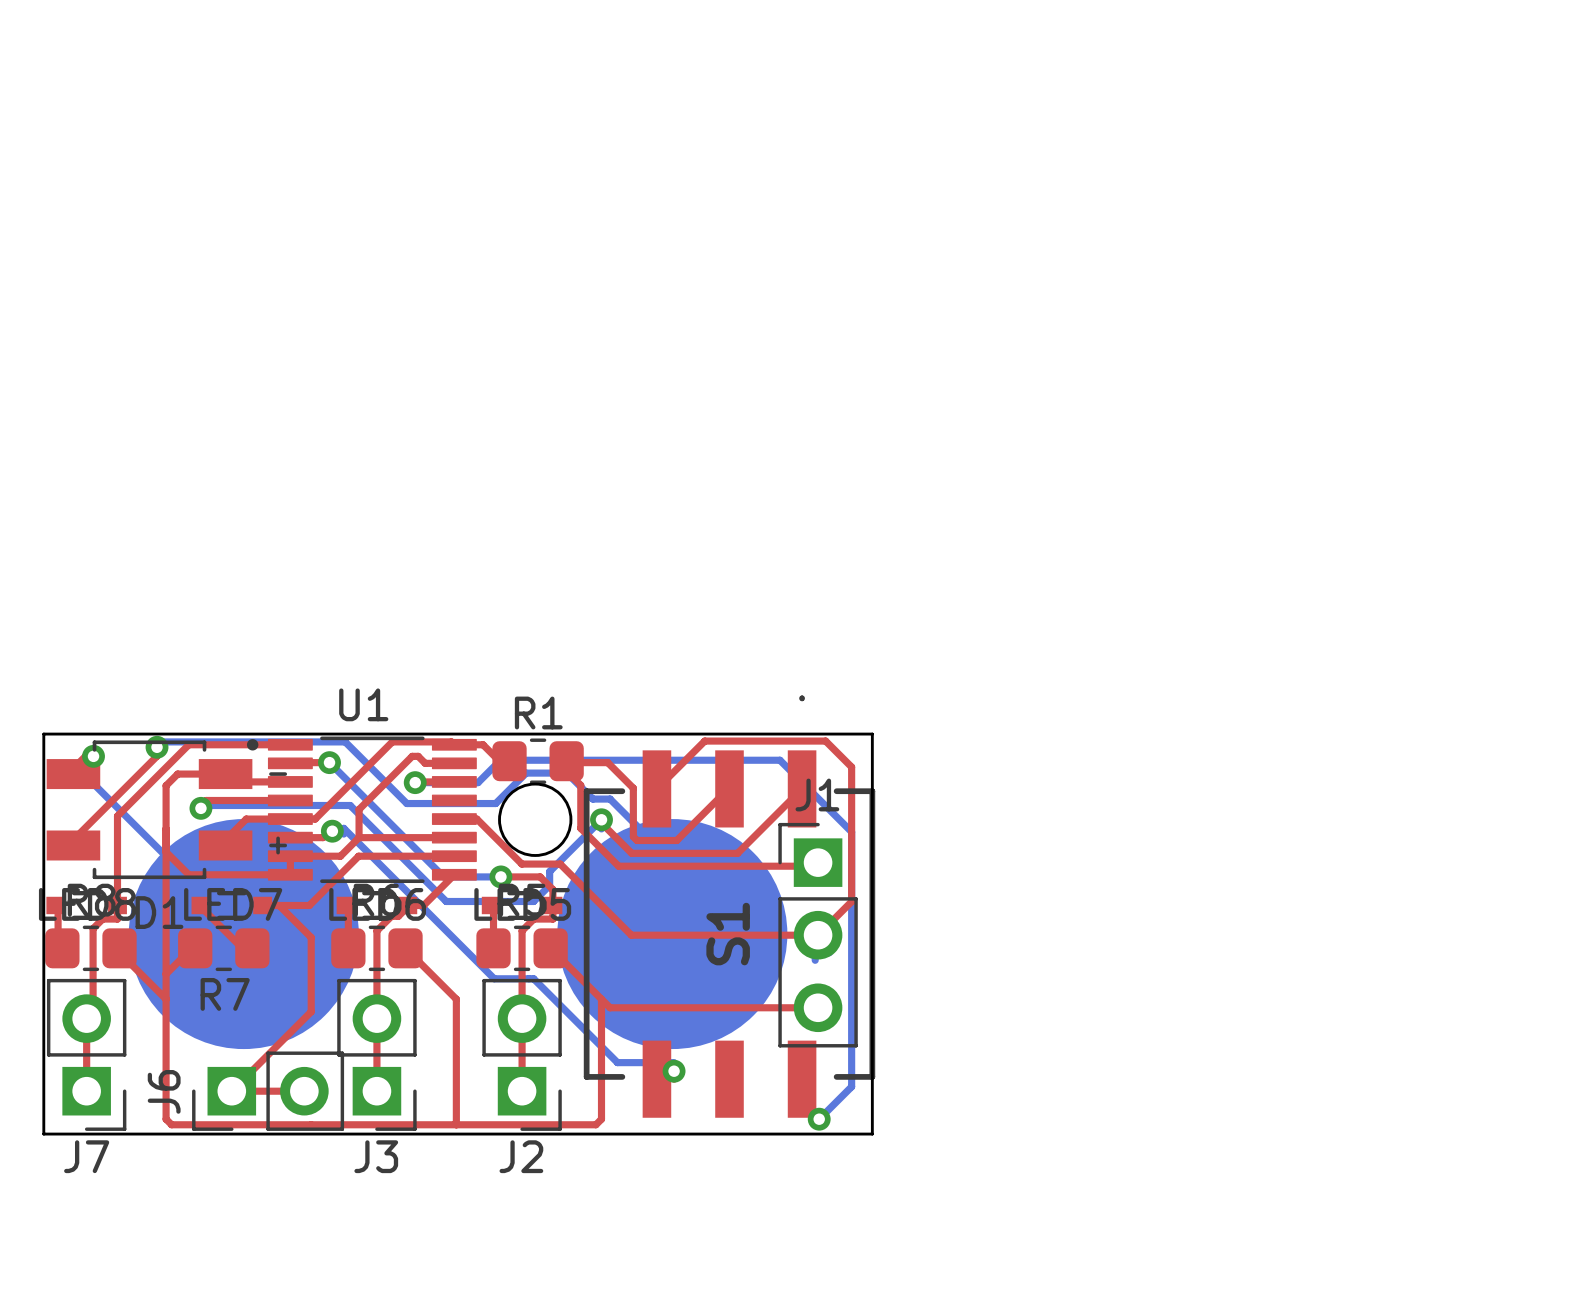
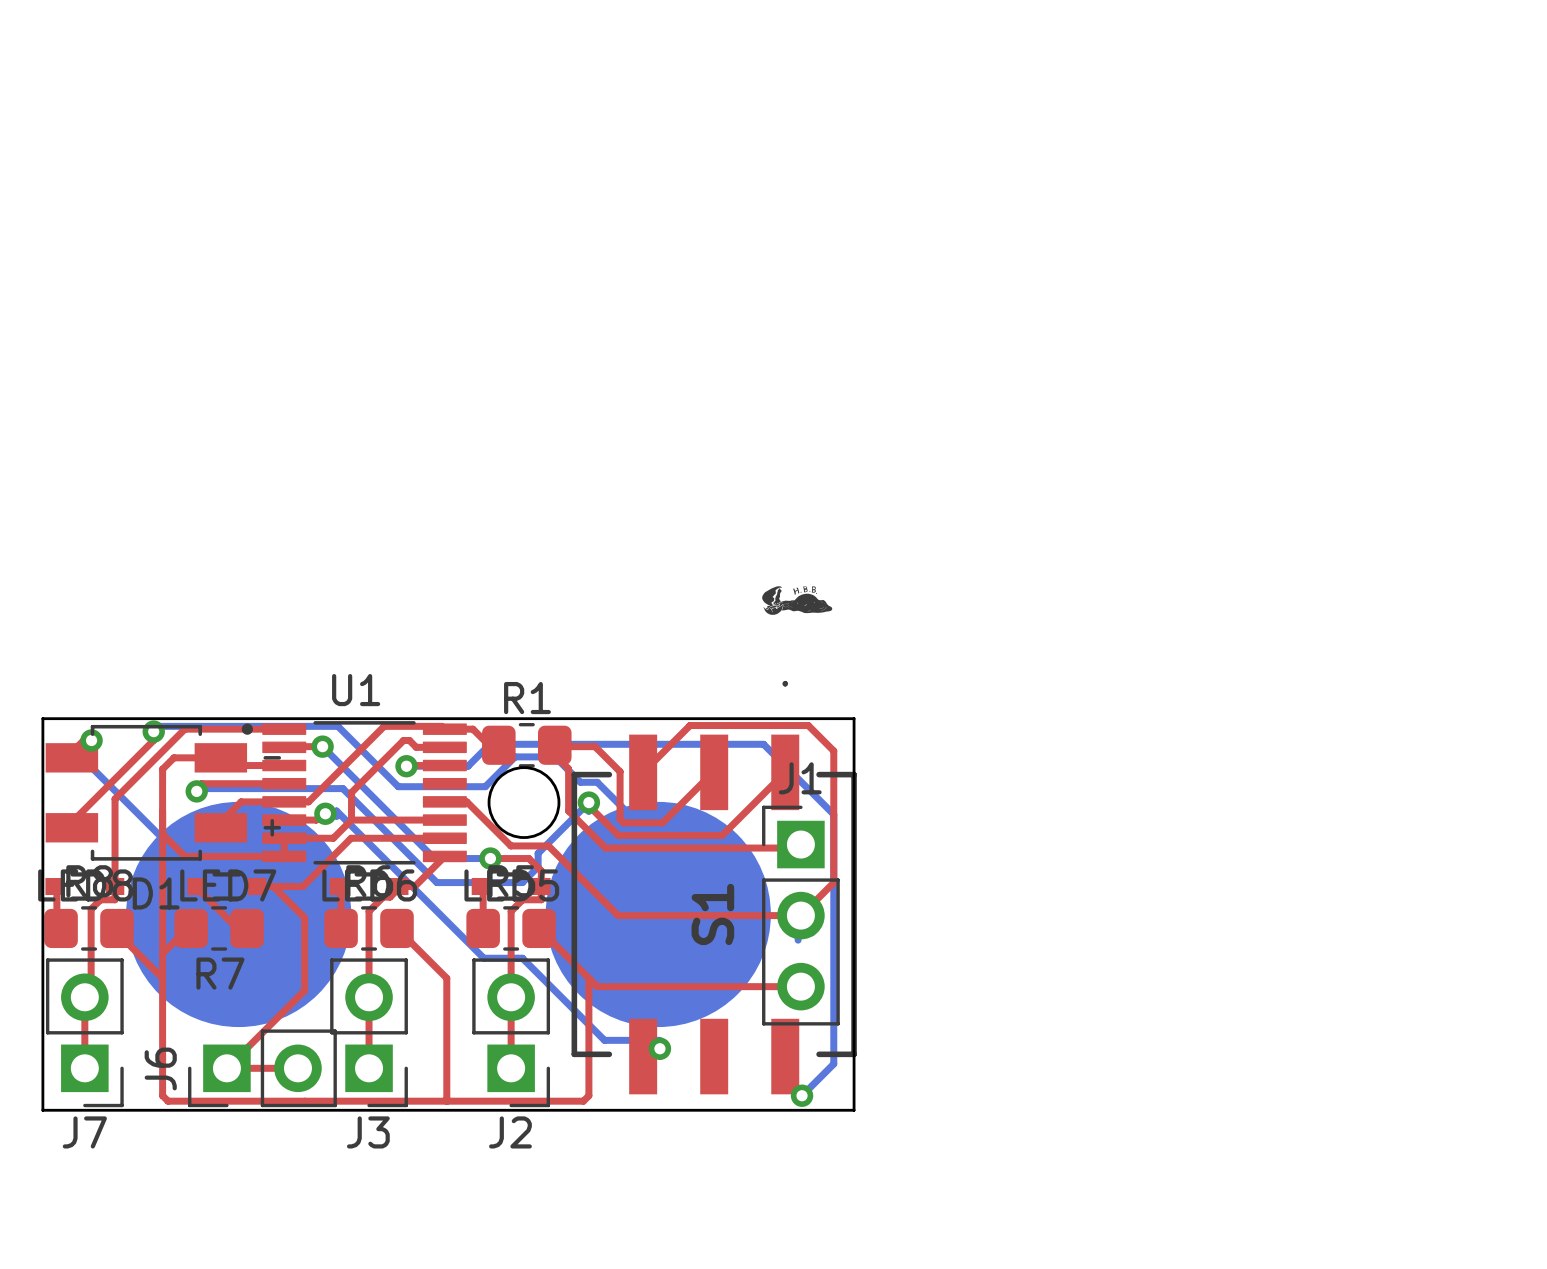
drawing: none -> [762, 586, 833, 615]

